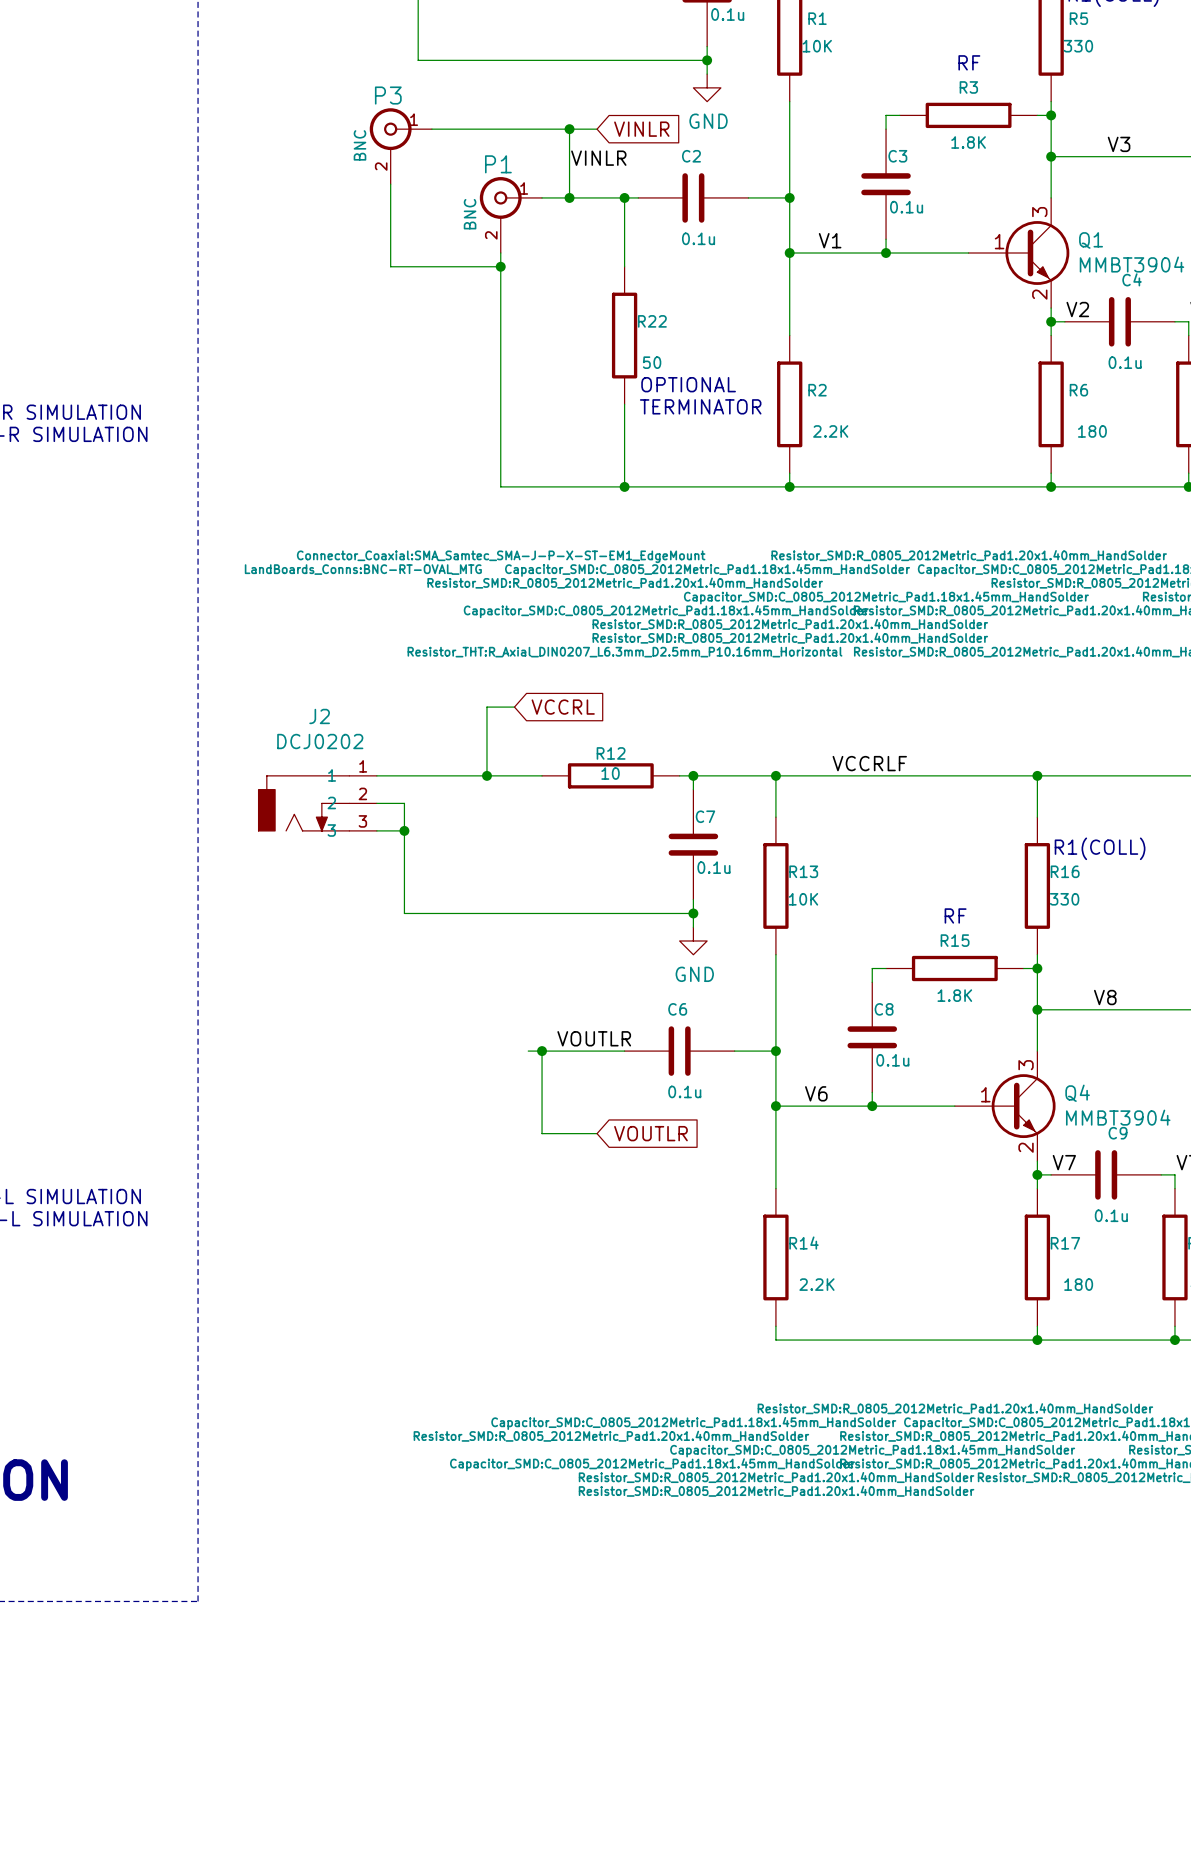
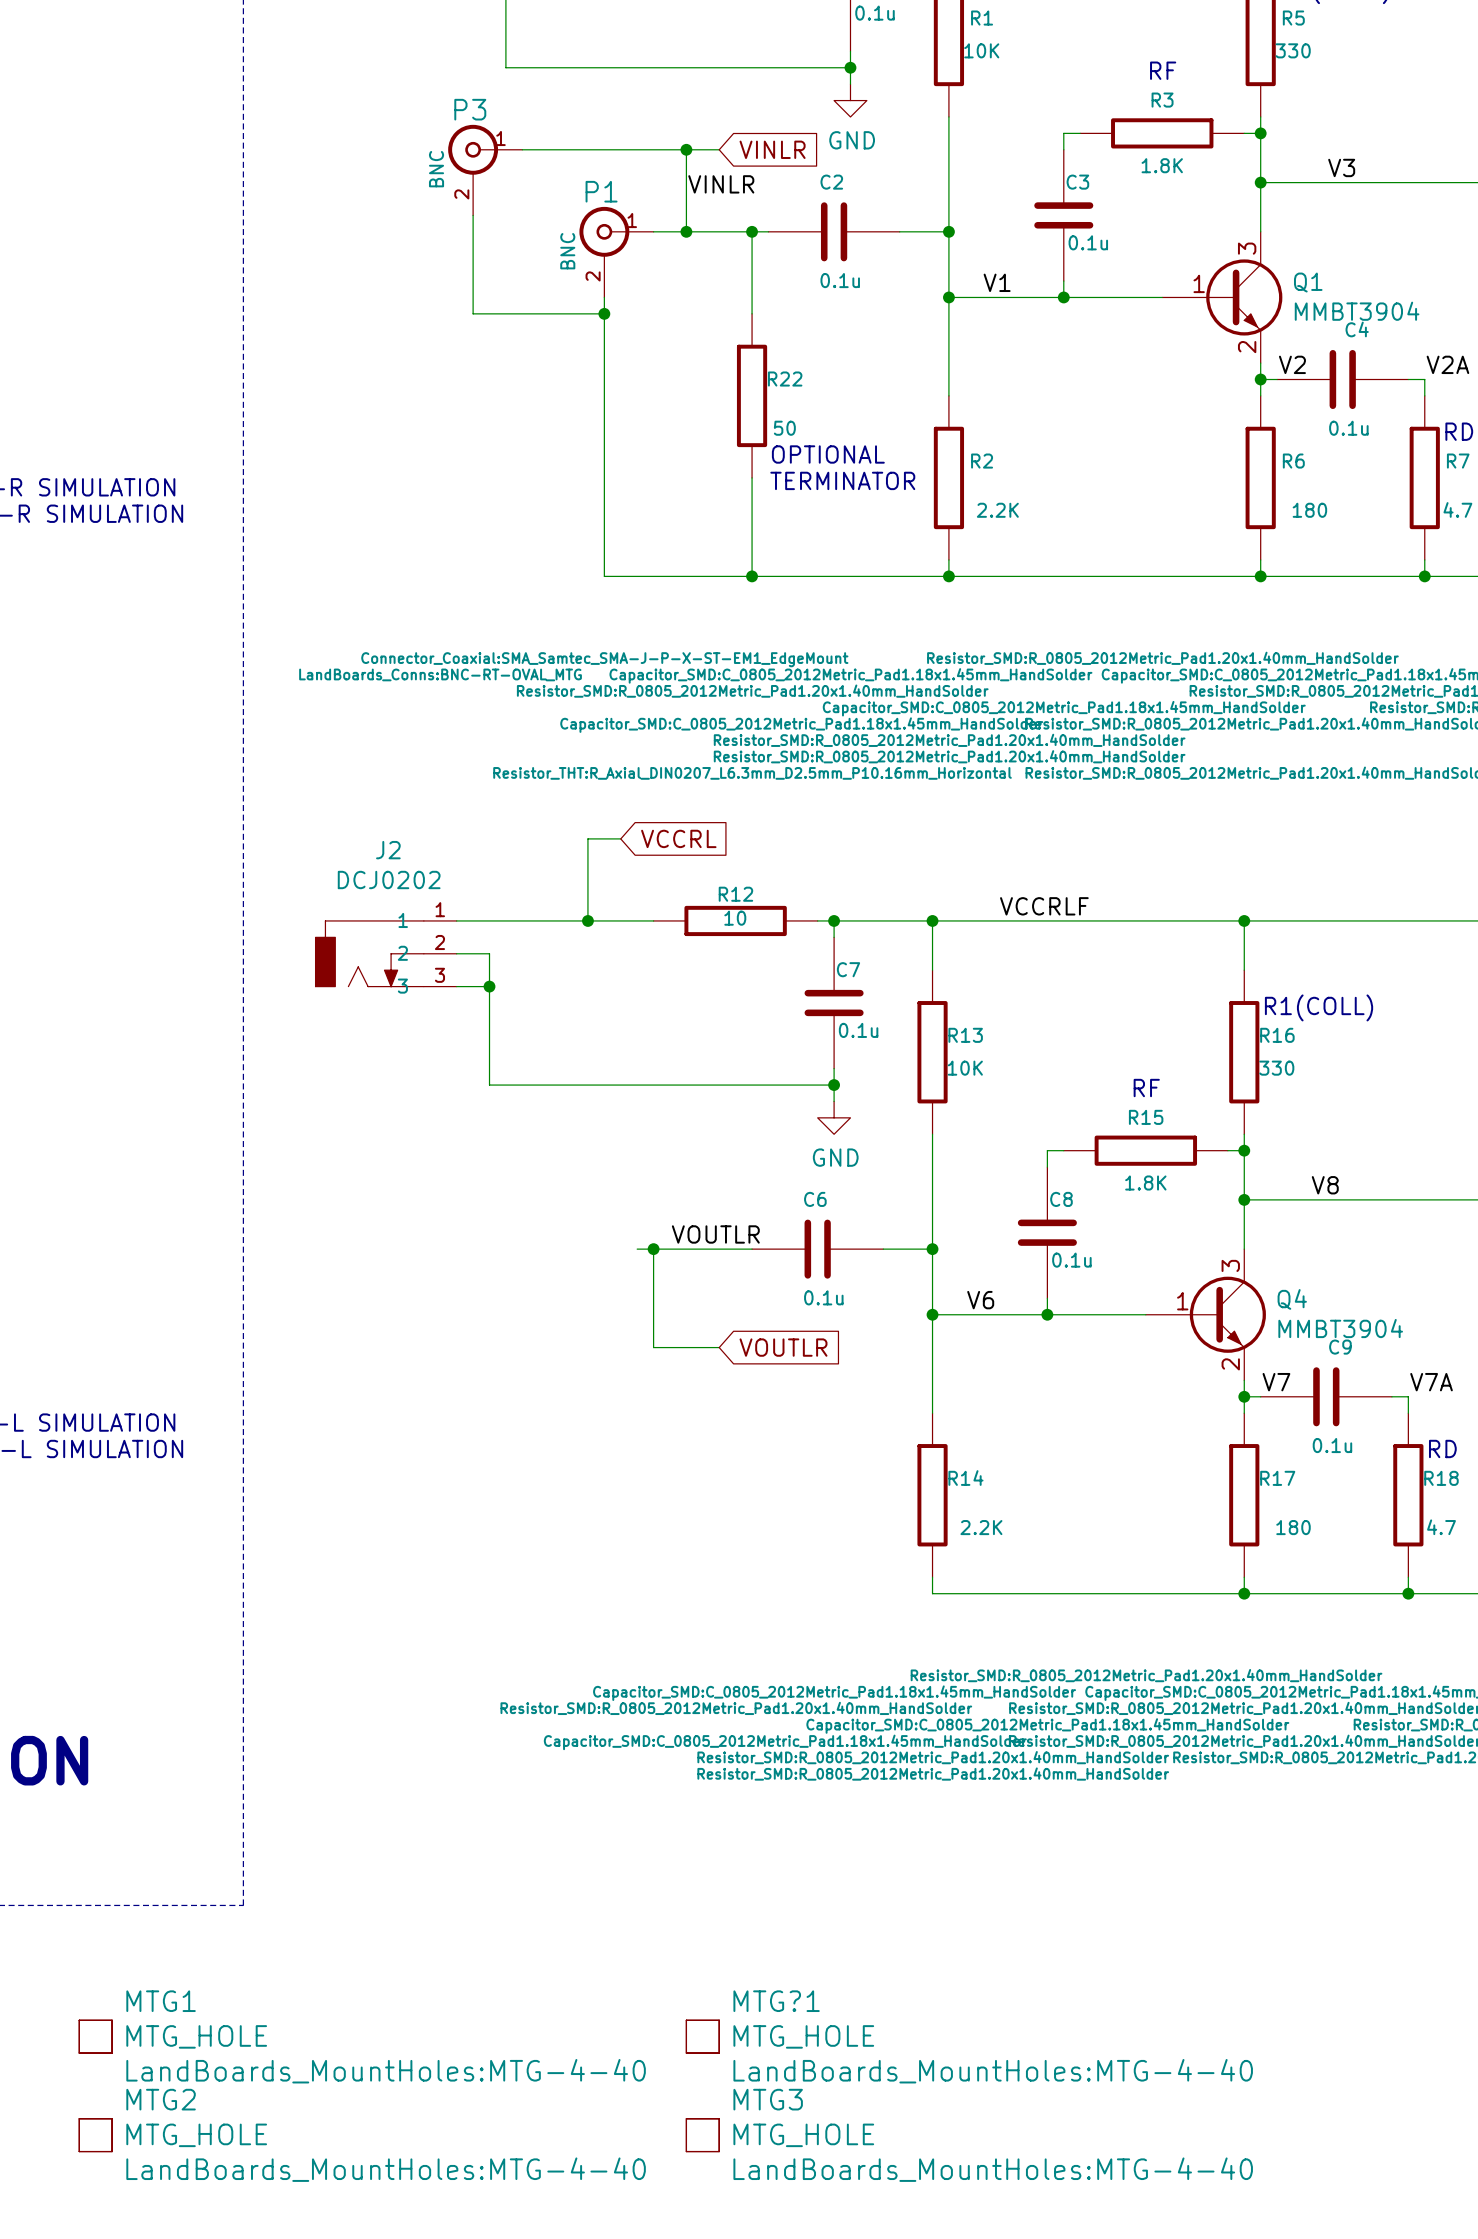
MTG1: none -> MTG_HOLE (95, 2036)
MTG?1: none -> MTG_HOLE (702, 2036)
MTG2: none -> MTG_HOLE (95, 2135)
MTG3: none -> MTG_HOLE (702, 2135)

